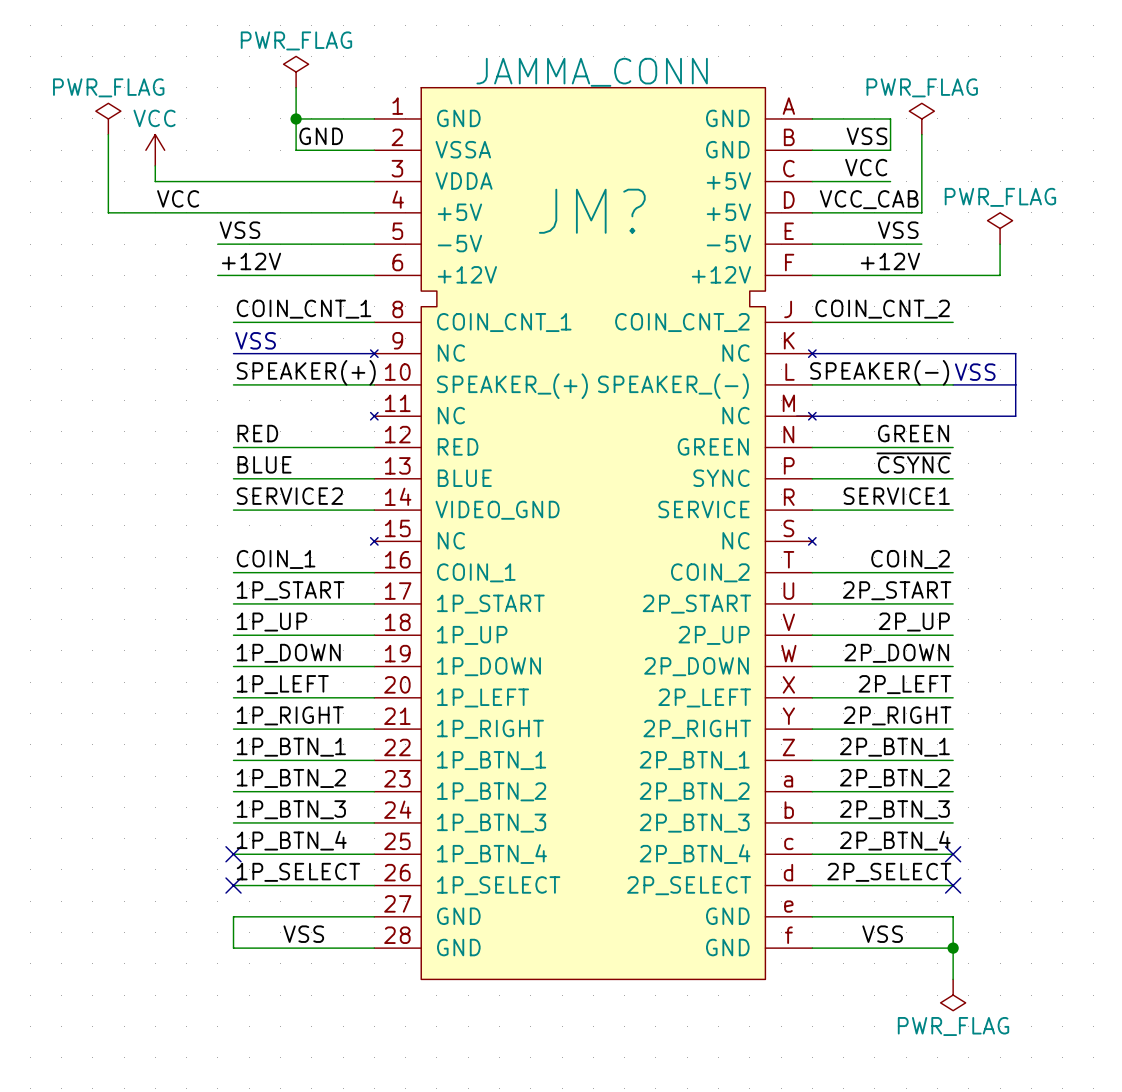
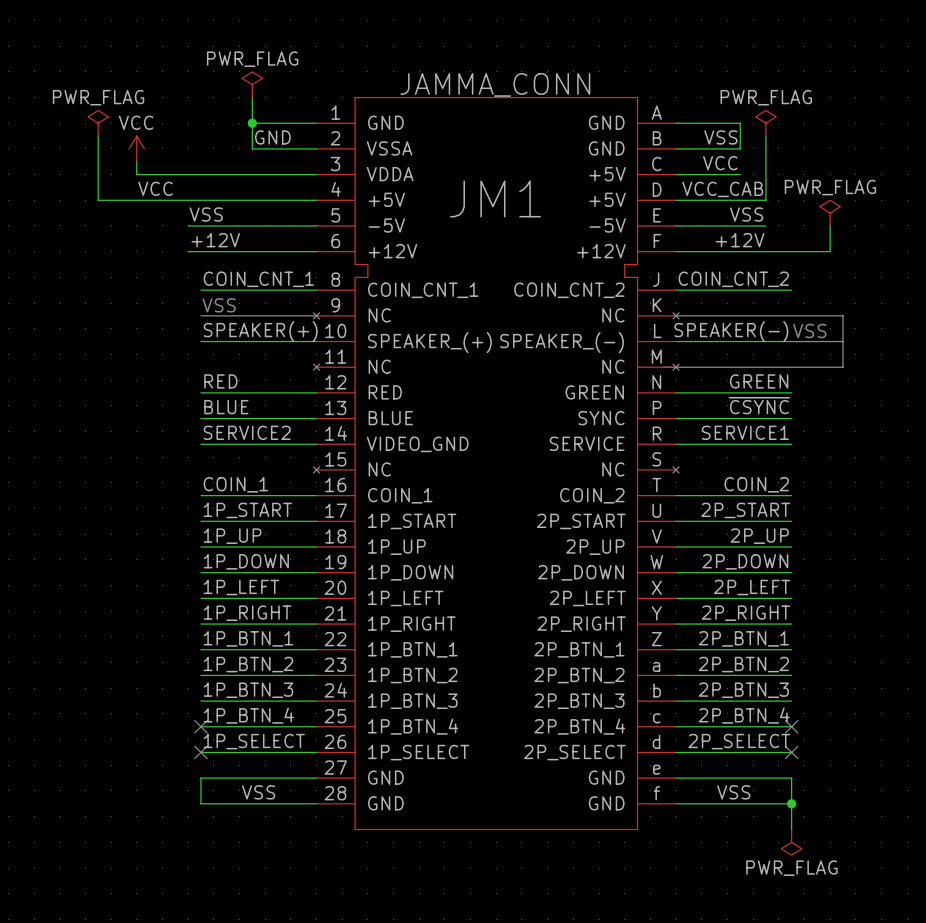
JM? name: JM? (592, 211) -> JM1 (495, 198)

